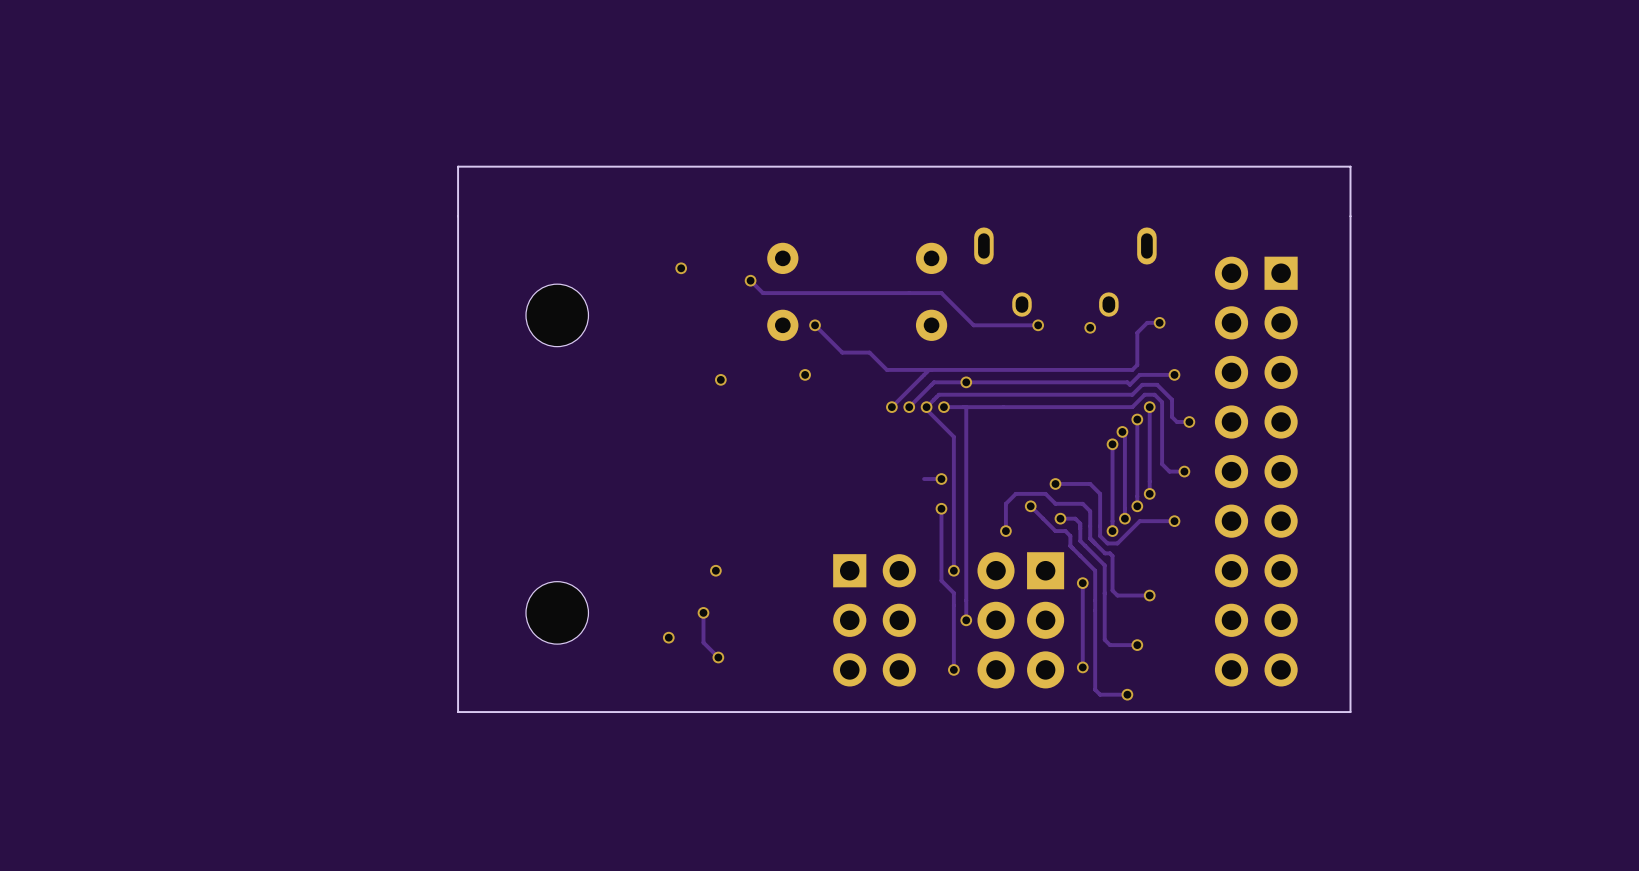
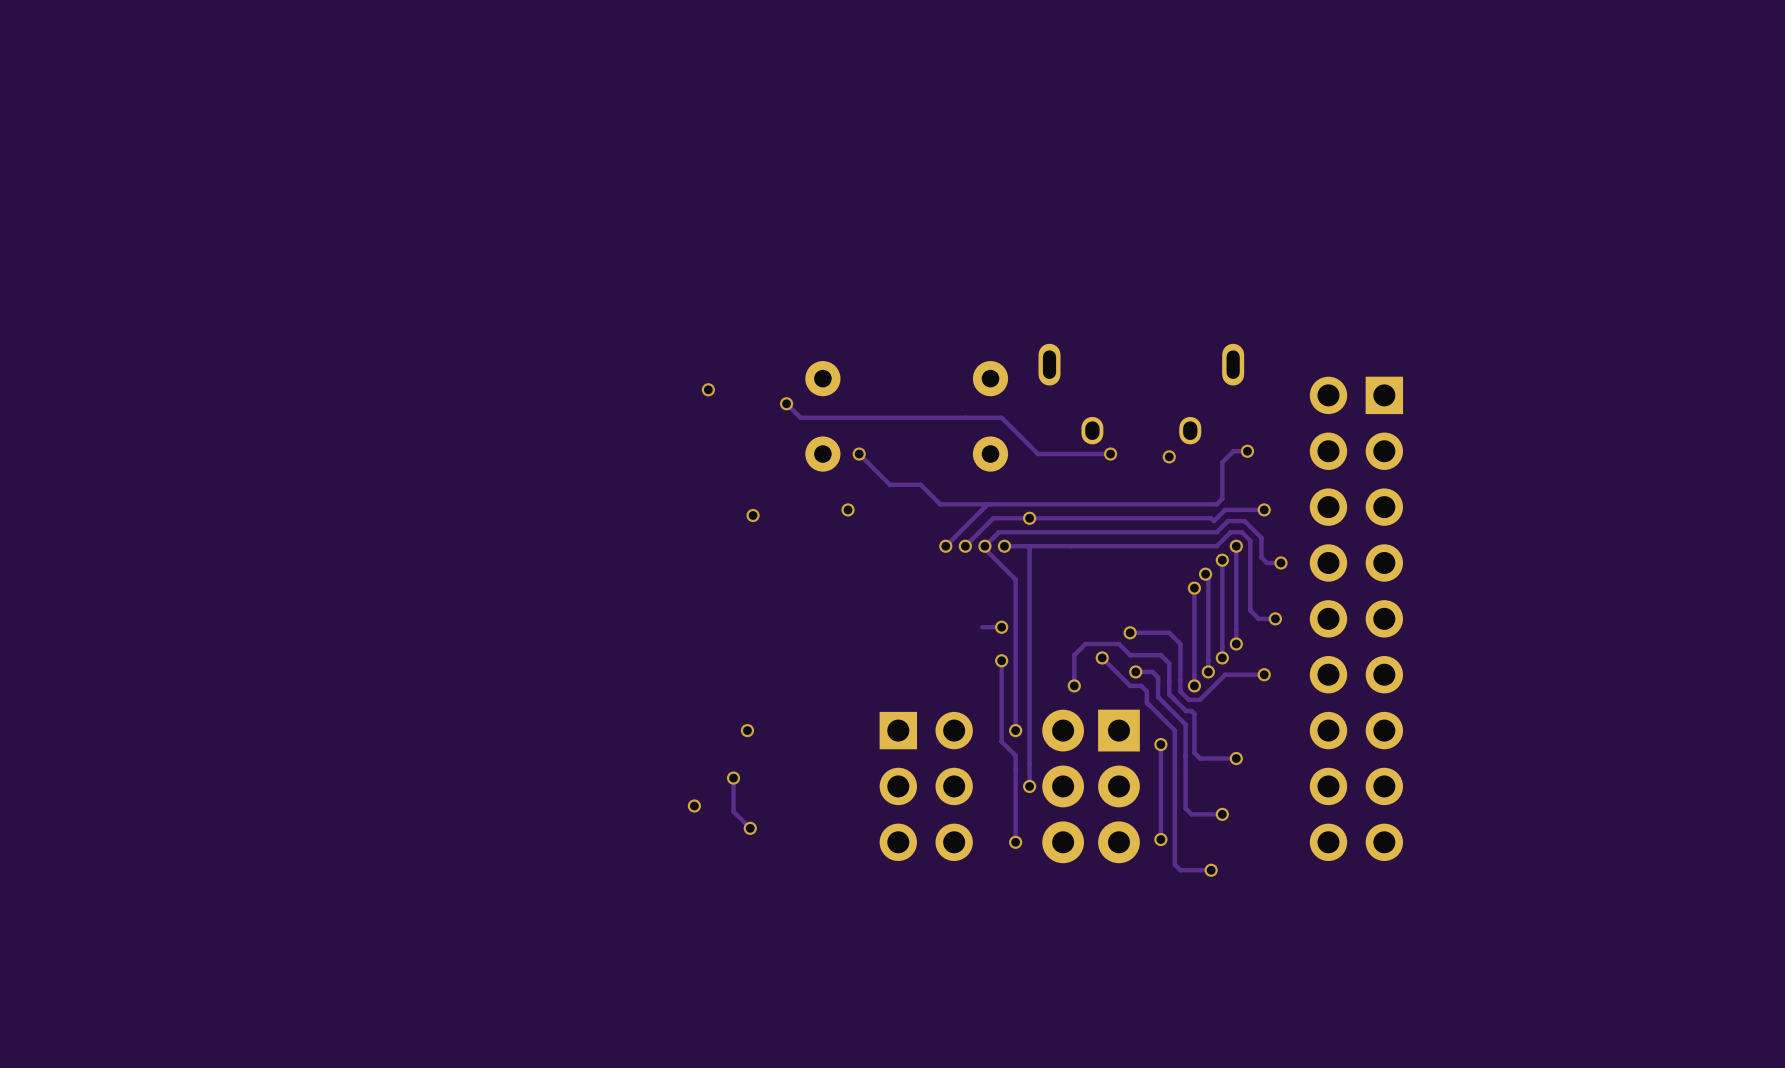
board edge: (1350, 166) (458, 166) (458, 712) (1350, 712) (1350, 166) -> none
part: (557, 315) -> none
part: (557, 612) -> none

